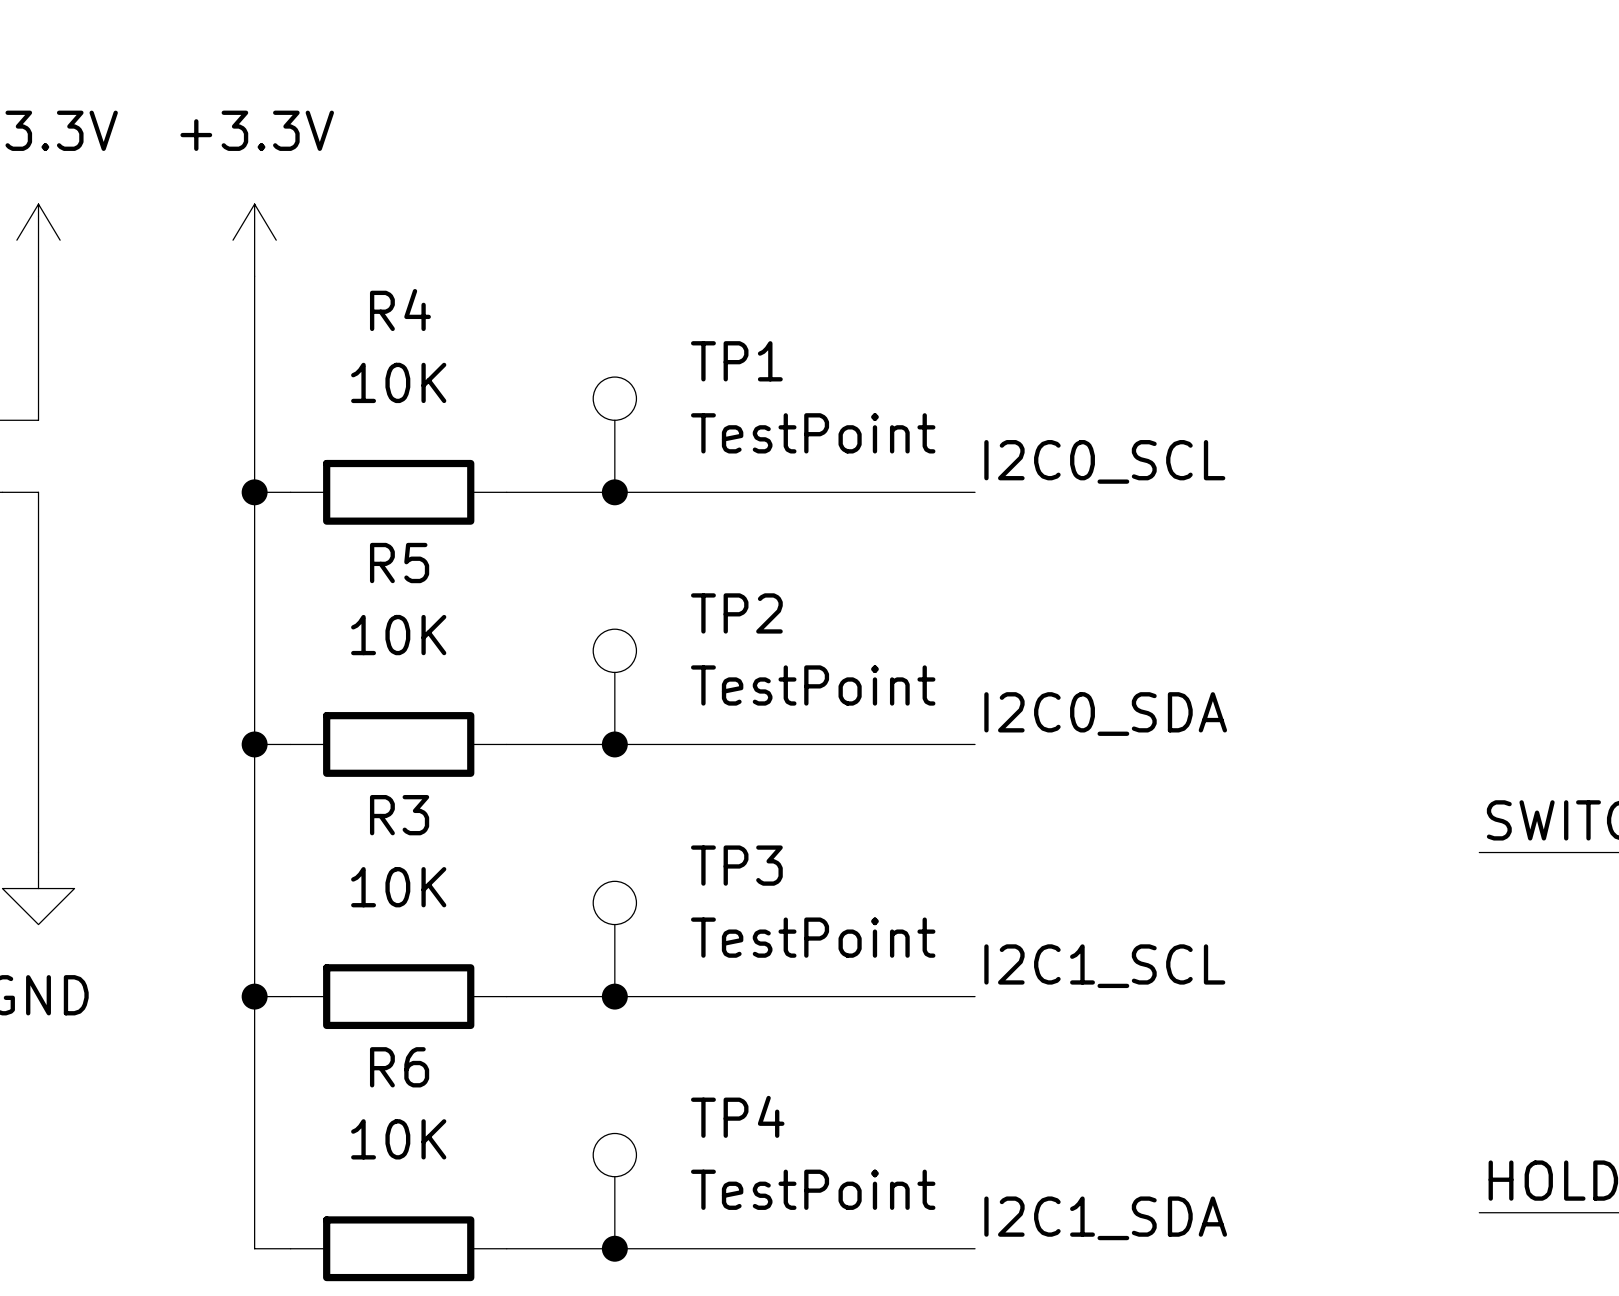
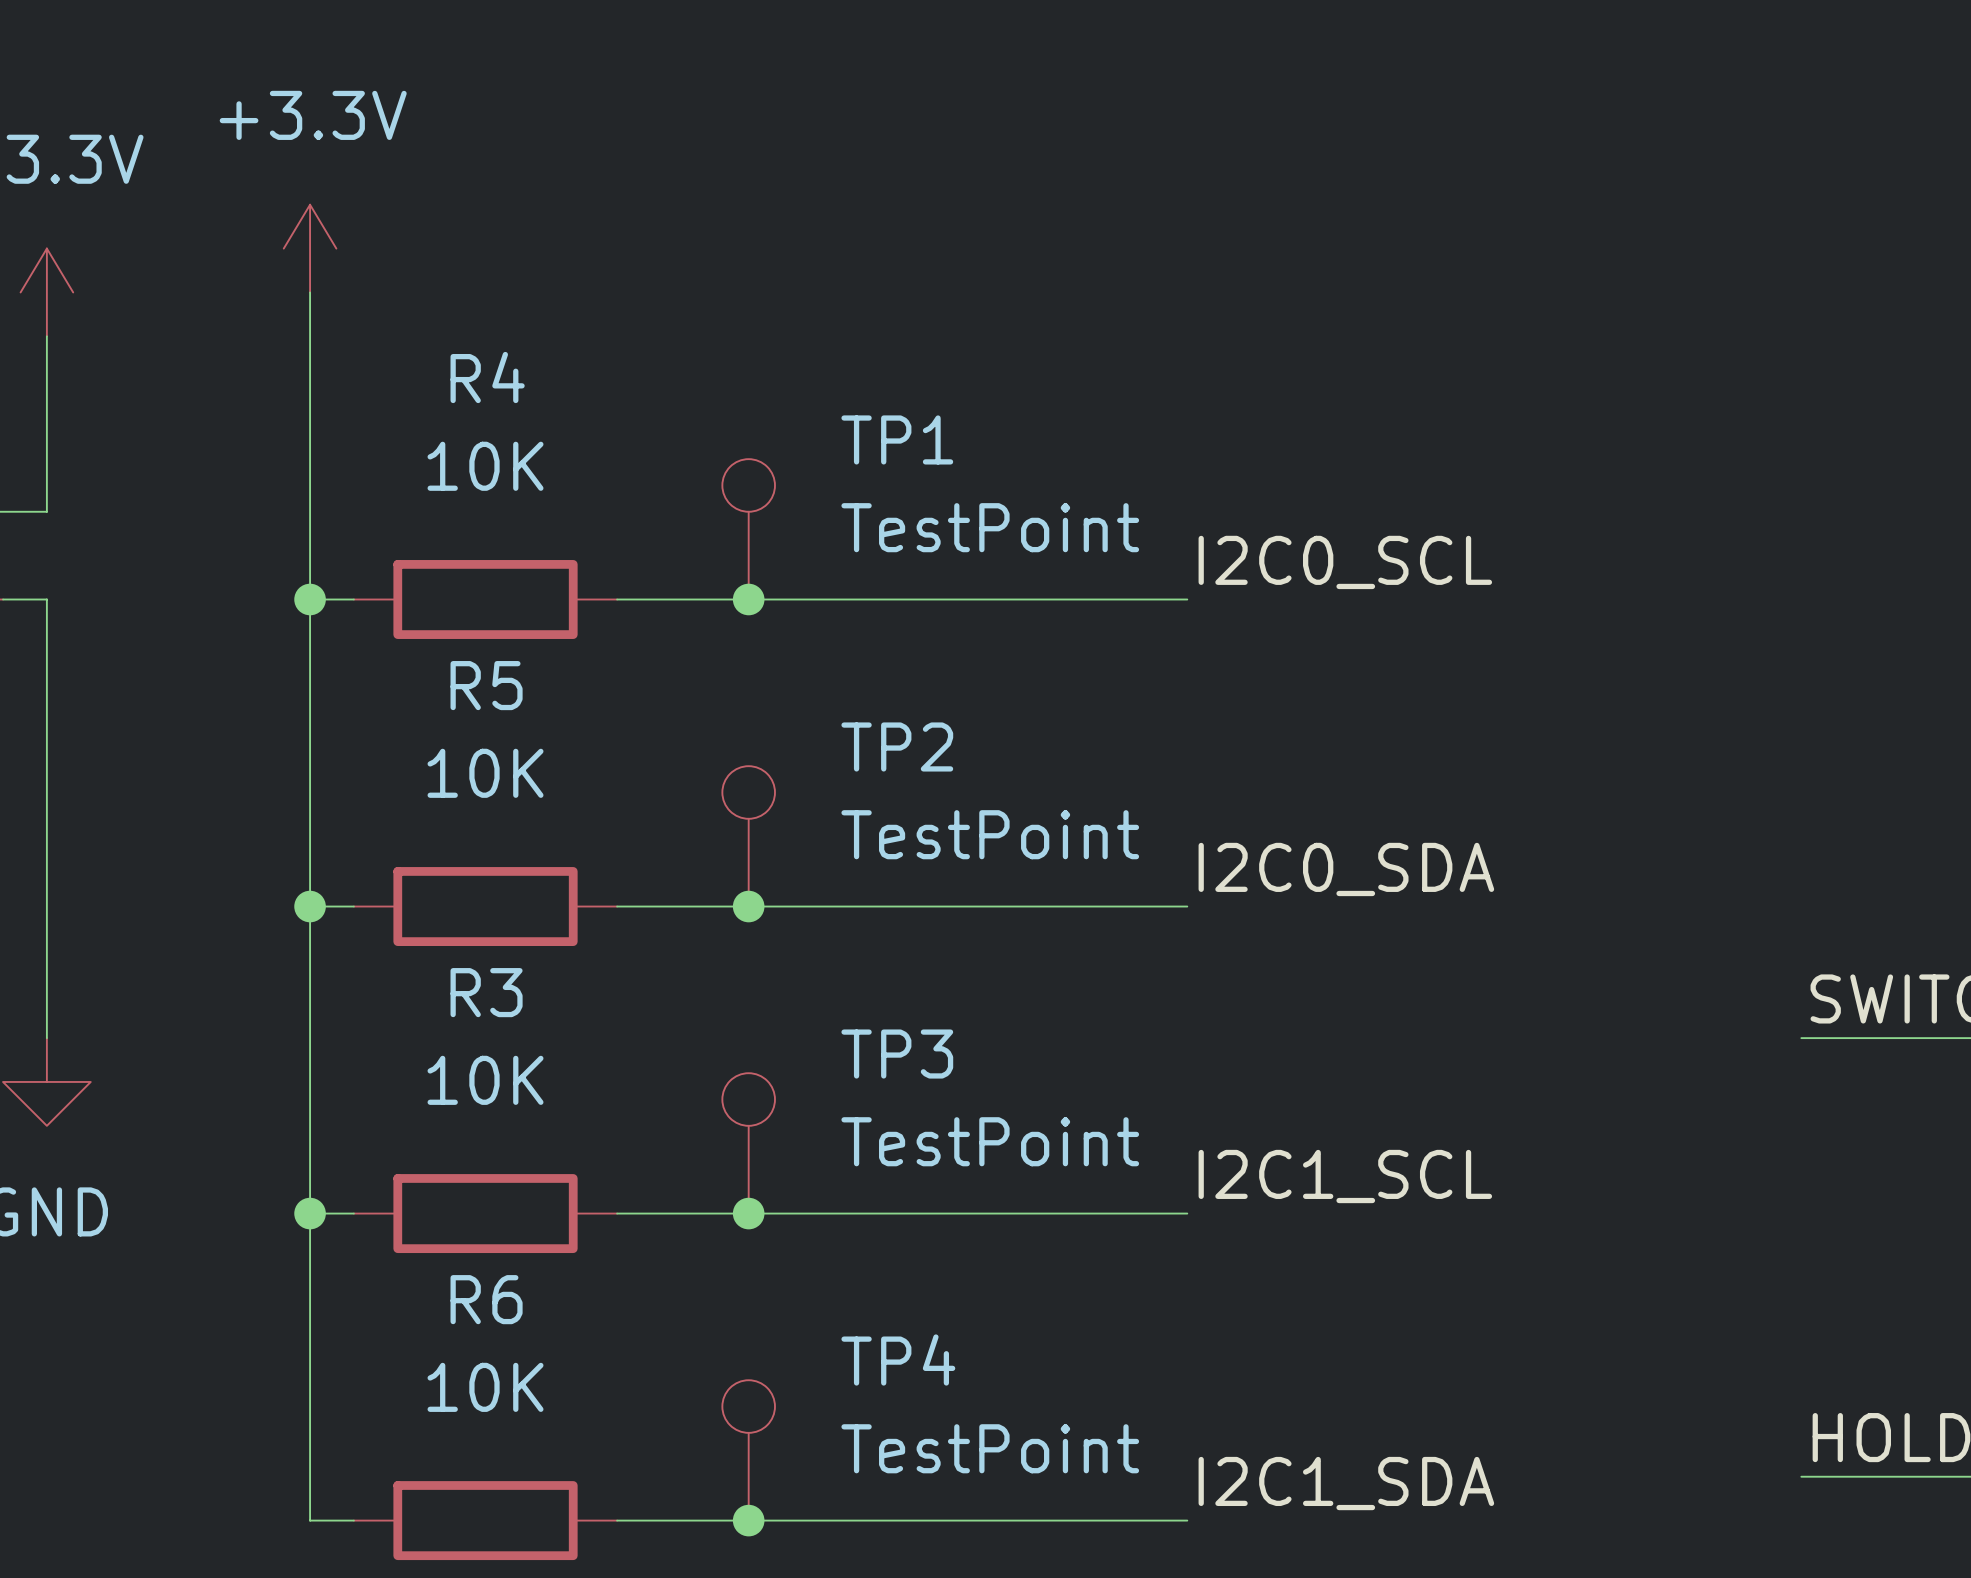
power symbol position: +3.3V (254, 240) -> +3.3V (310, 248)

